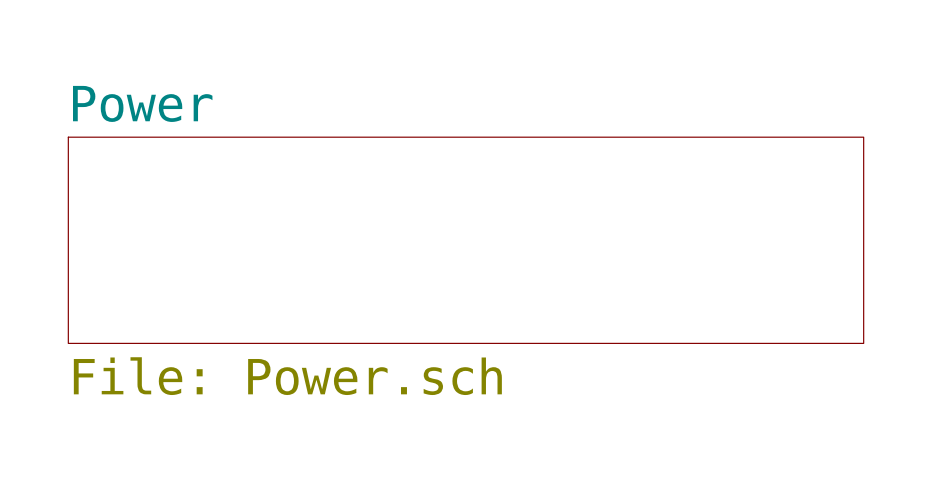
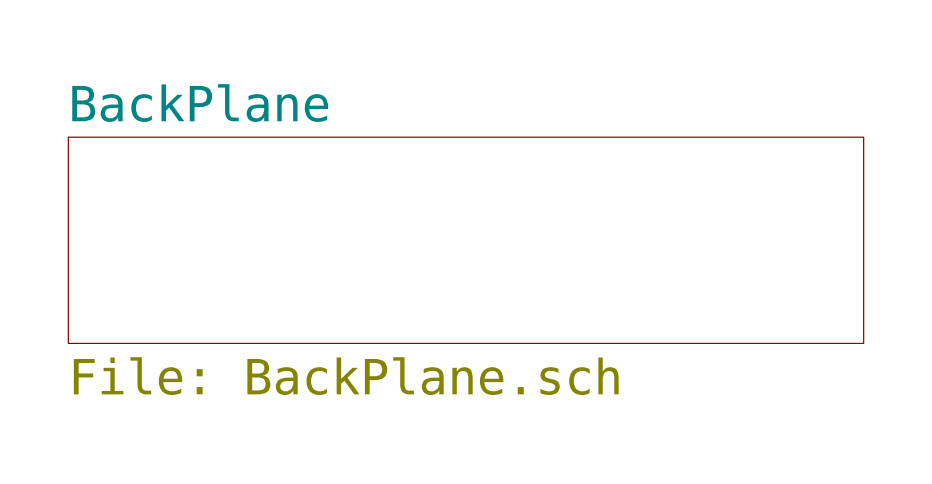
sheet Power name: Power (142, 103) -> BackPlane (200, 103)
sheet Power value: File: Power.sch (287, 376) -> File: BackPlane.sch (346, 376)

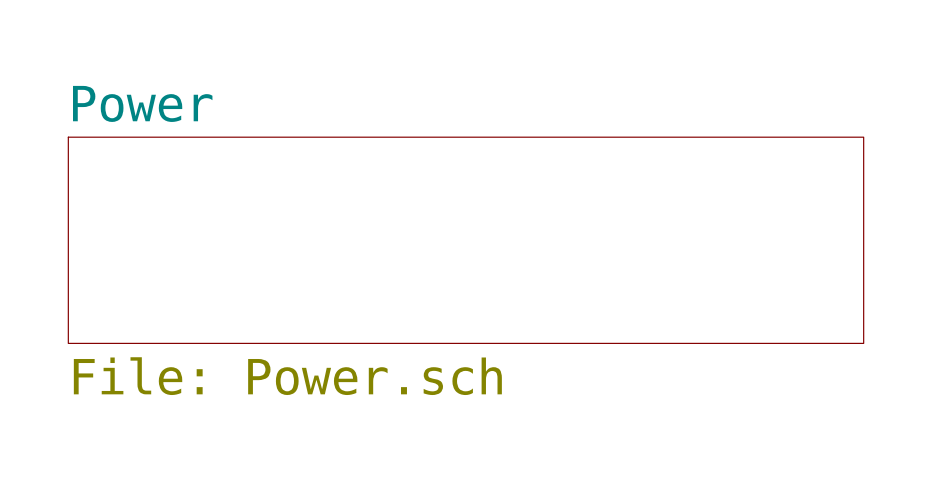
sheet BackPlane name: BackPlane (200, 103) -> Power (142, 103)
sheet BackPlane value: File: BackPlane.sch (346, 376) -> File: Power.sch (287, 376)

